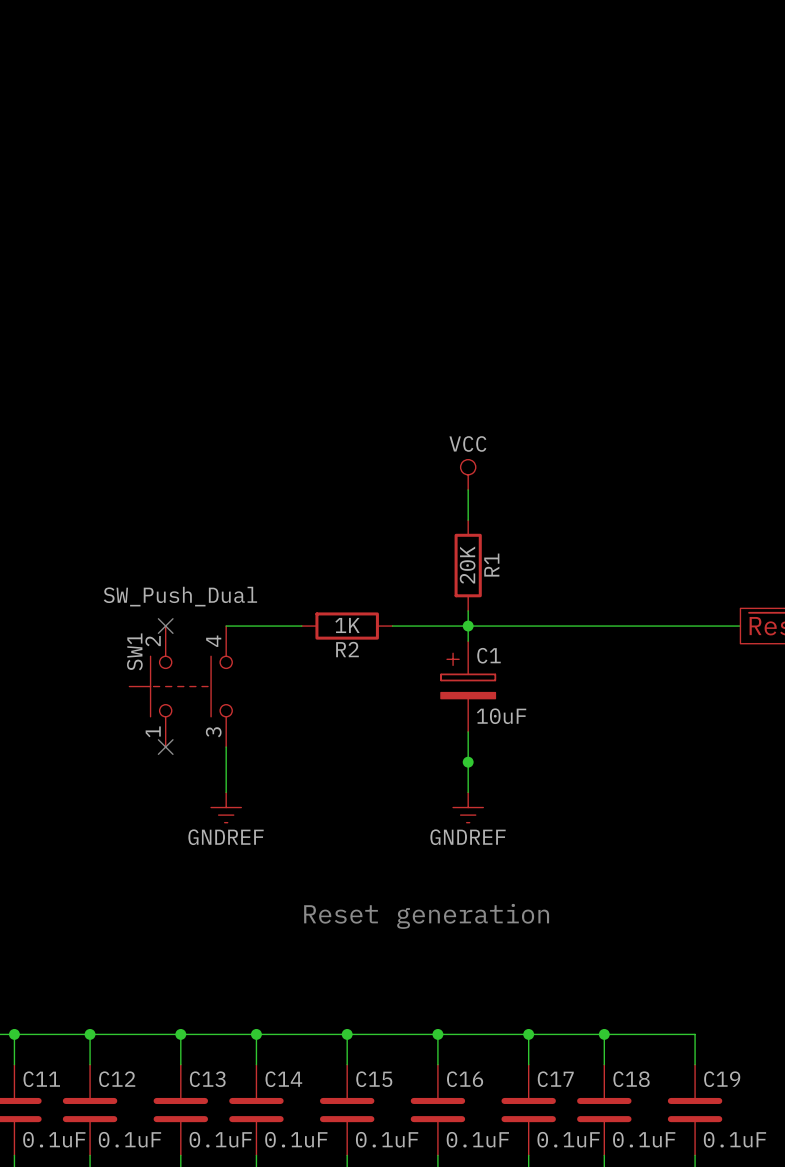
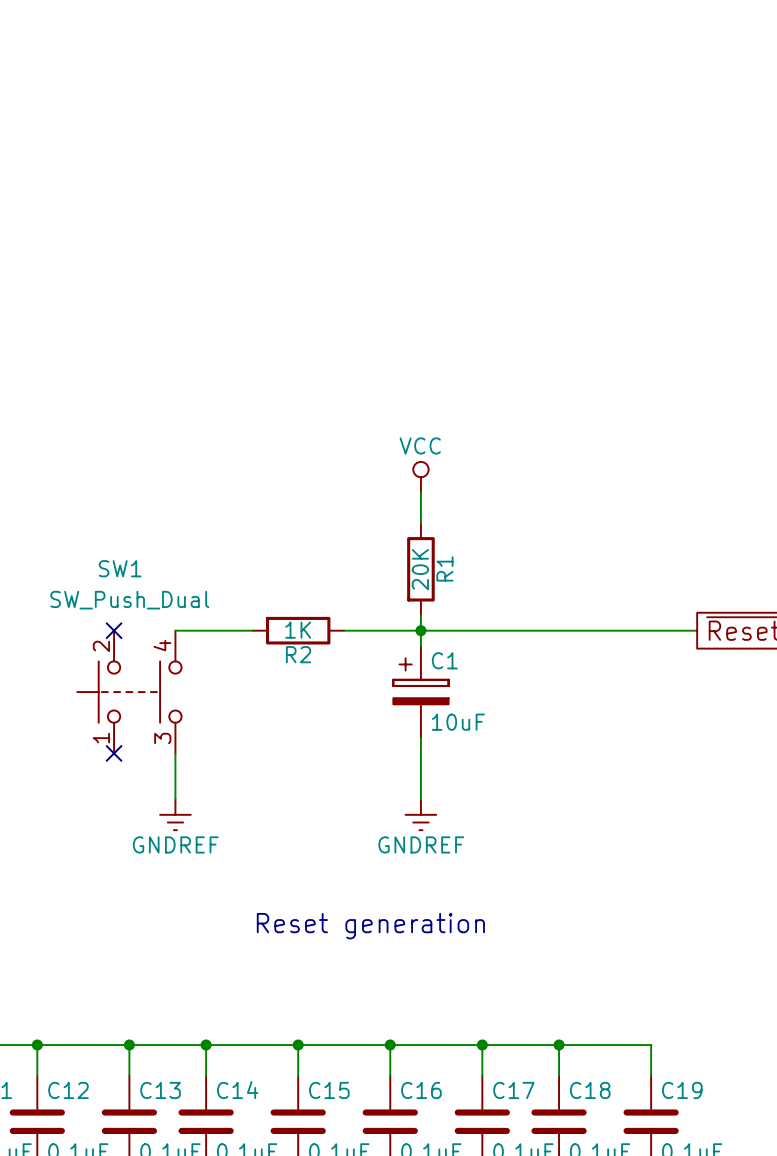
SW1 name rotation: 0° (134, 651) -> 90° clockwise (120, 568)
SW1 name position: SW1 (134, 651) -> SW1 (120, 568)
junction: (468, 762) -> none

